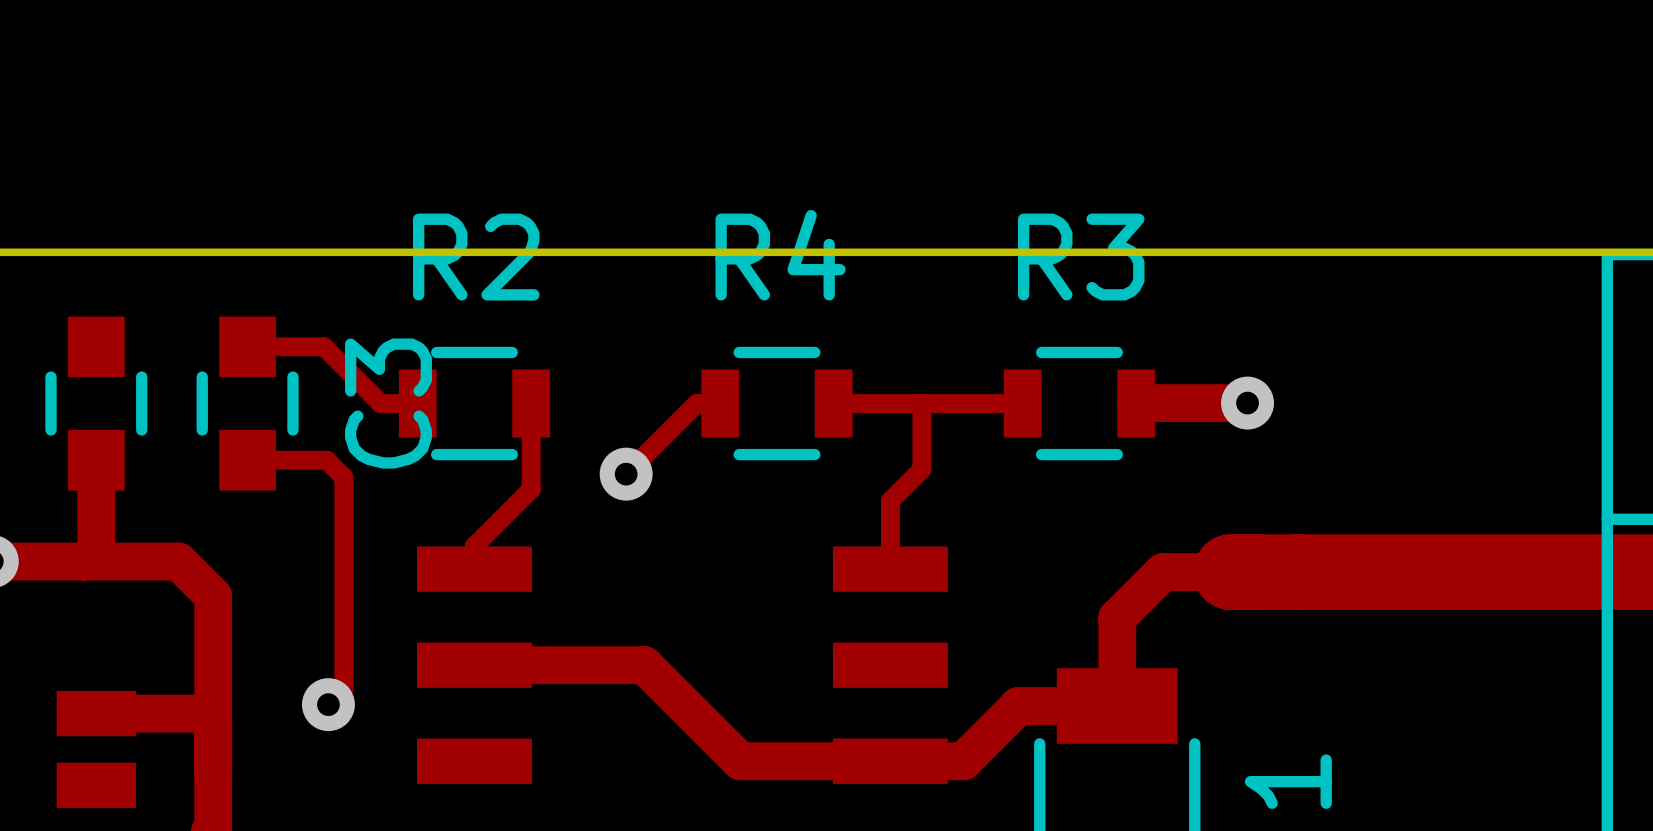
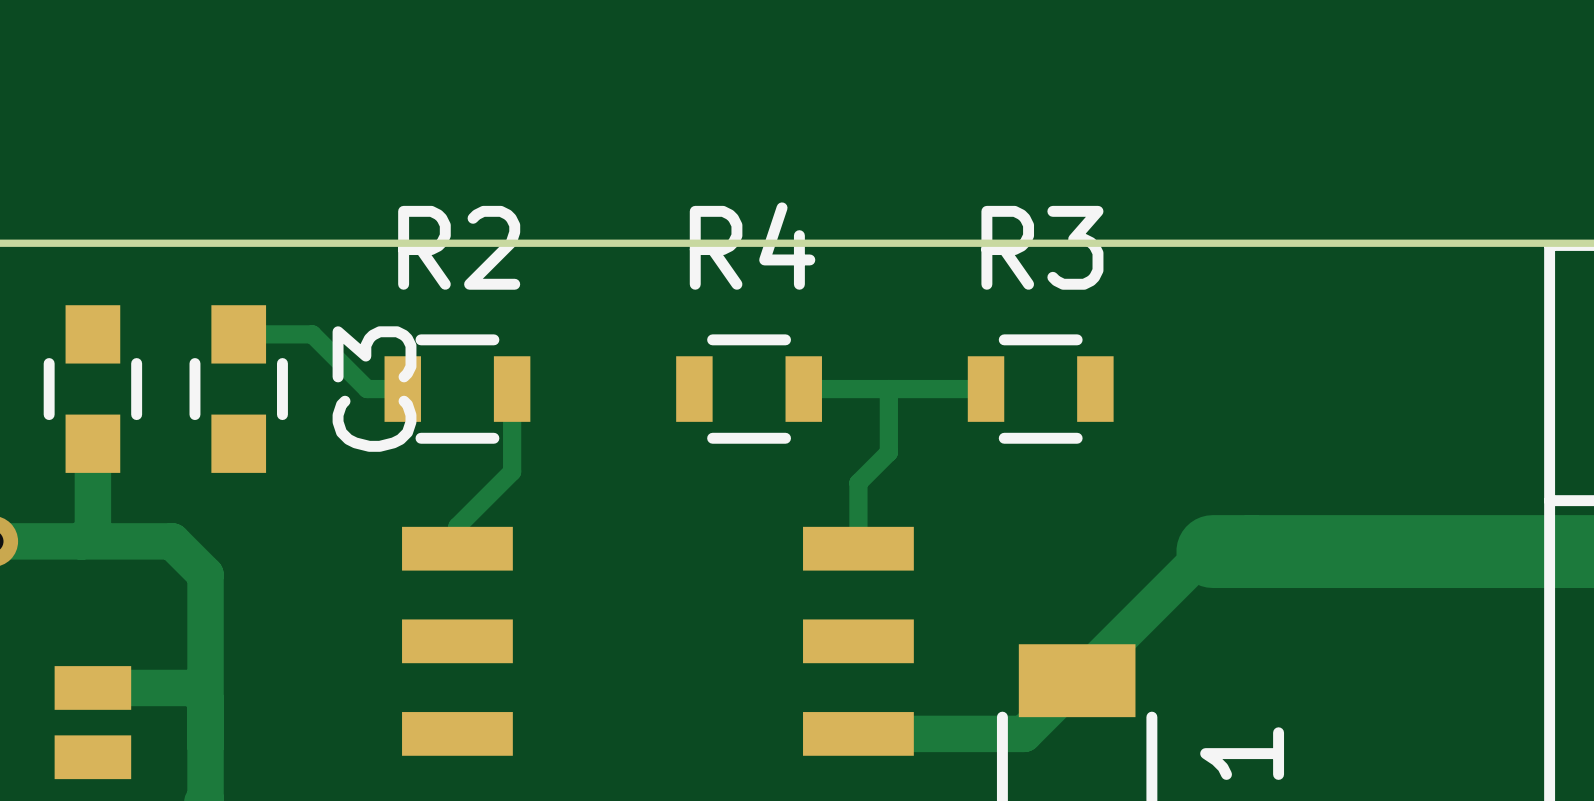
track: (720, 403) (696, 403) (626, 474) -> none
track: (1136, 403) (1247, 403) -> none
via: (1247, 403) -> none
track: (247, 460) (326, 460) (343, 477) (343, 689) (328, 704) -> none
via: (626, 474) -> none
track: (1258, 572) (1163, 572) (1117, 617) (1117, 706) (1018, 706) (963, 761) -> (1206, 551) (1023, 733) (928, 733)
track: (474, 665) (644, 665) (740, 761) (890, 761) -> none
via: (328, 704) -> none

